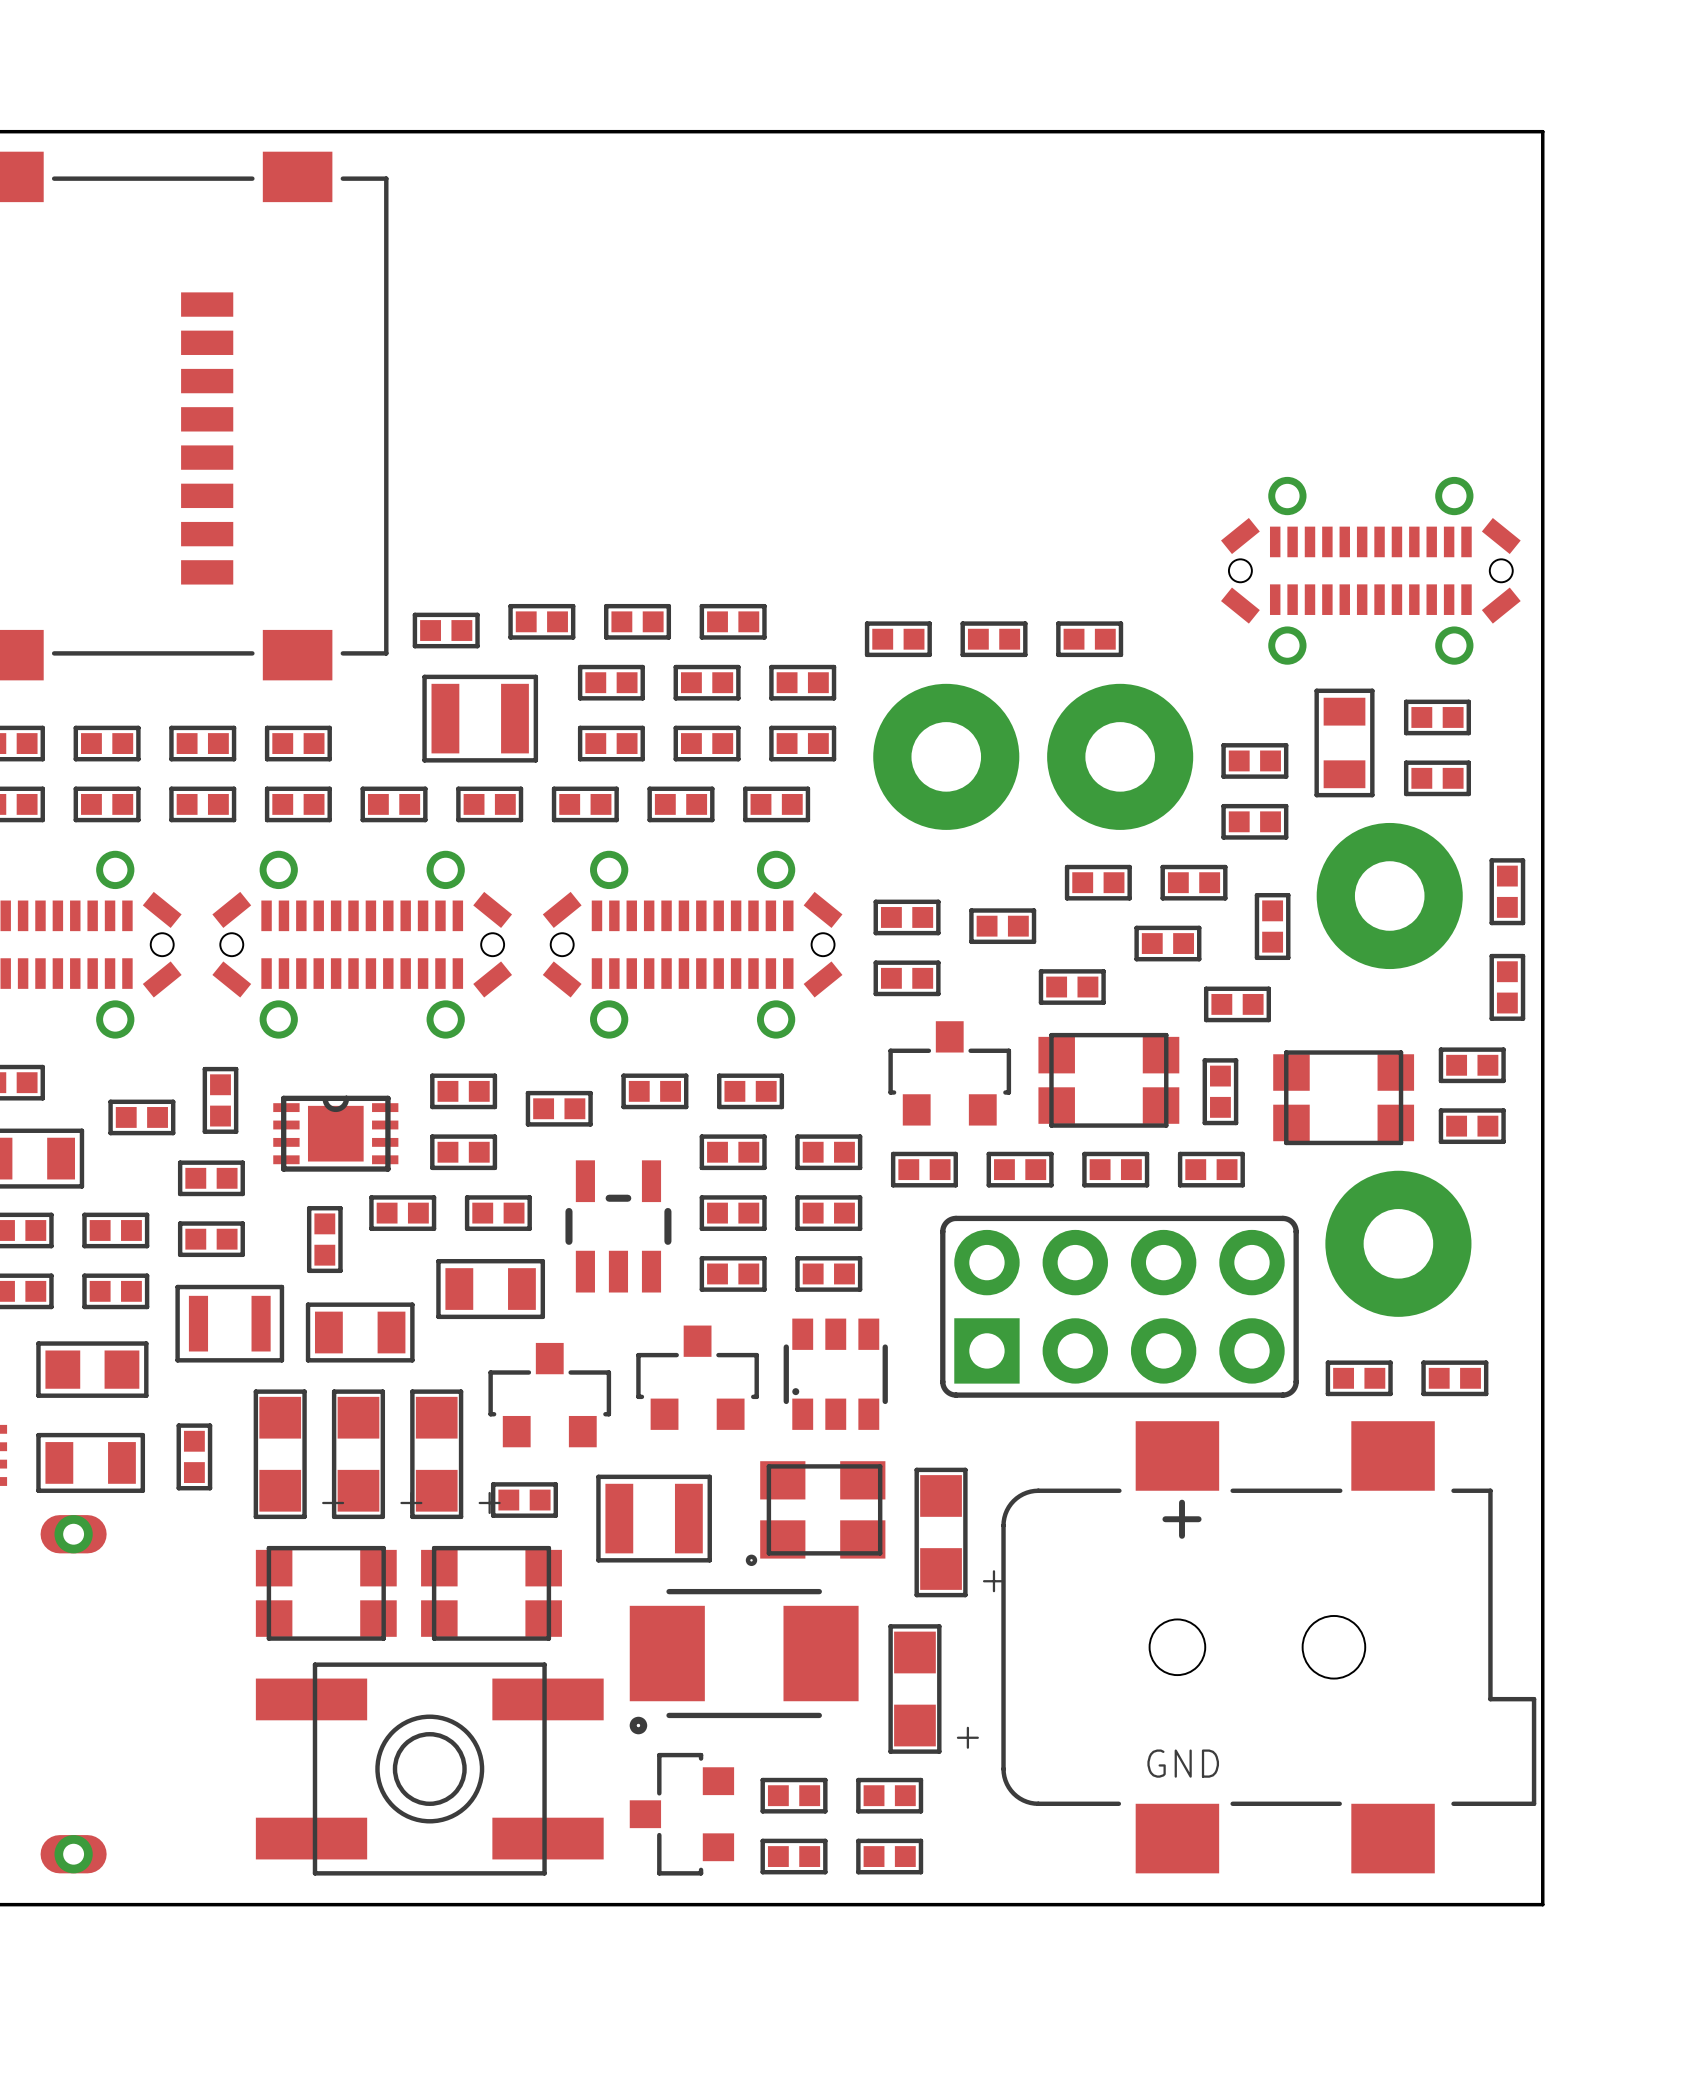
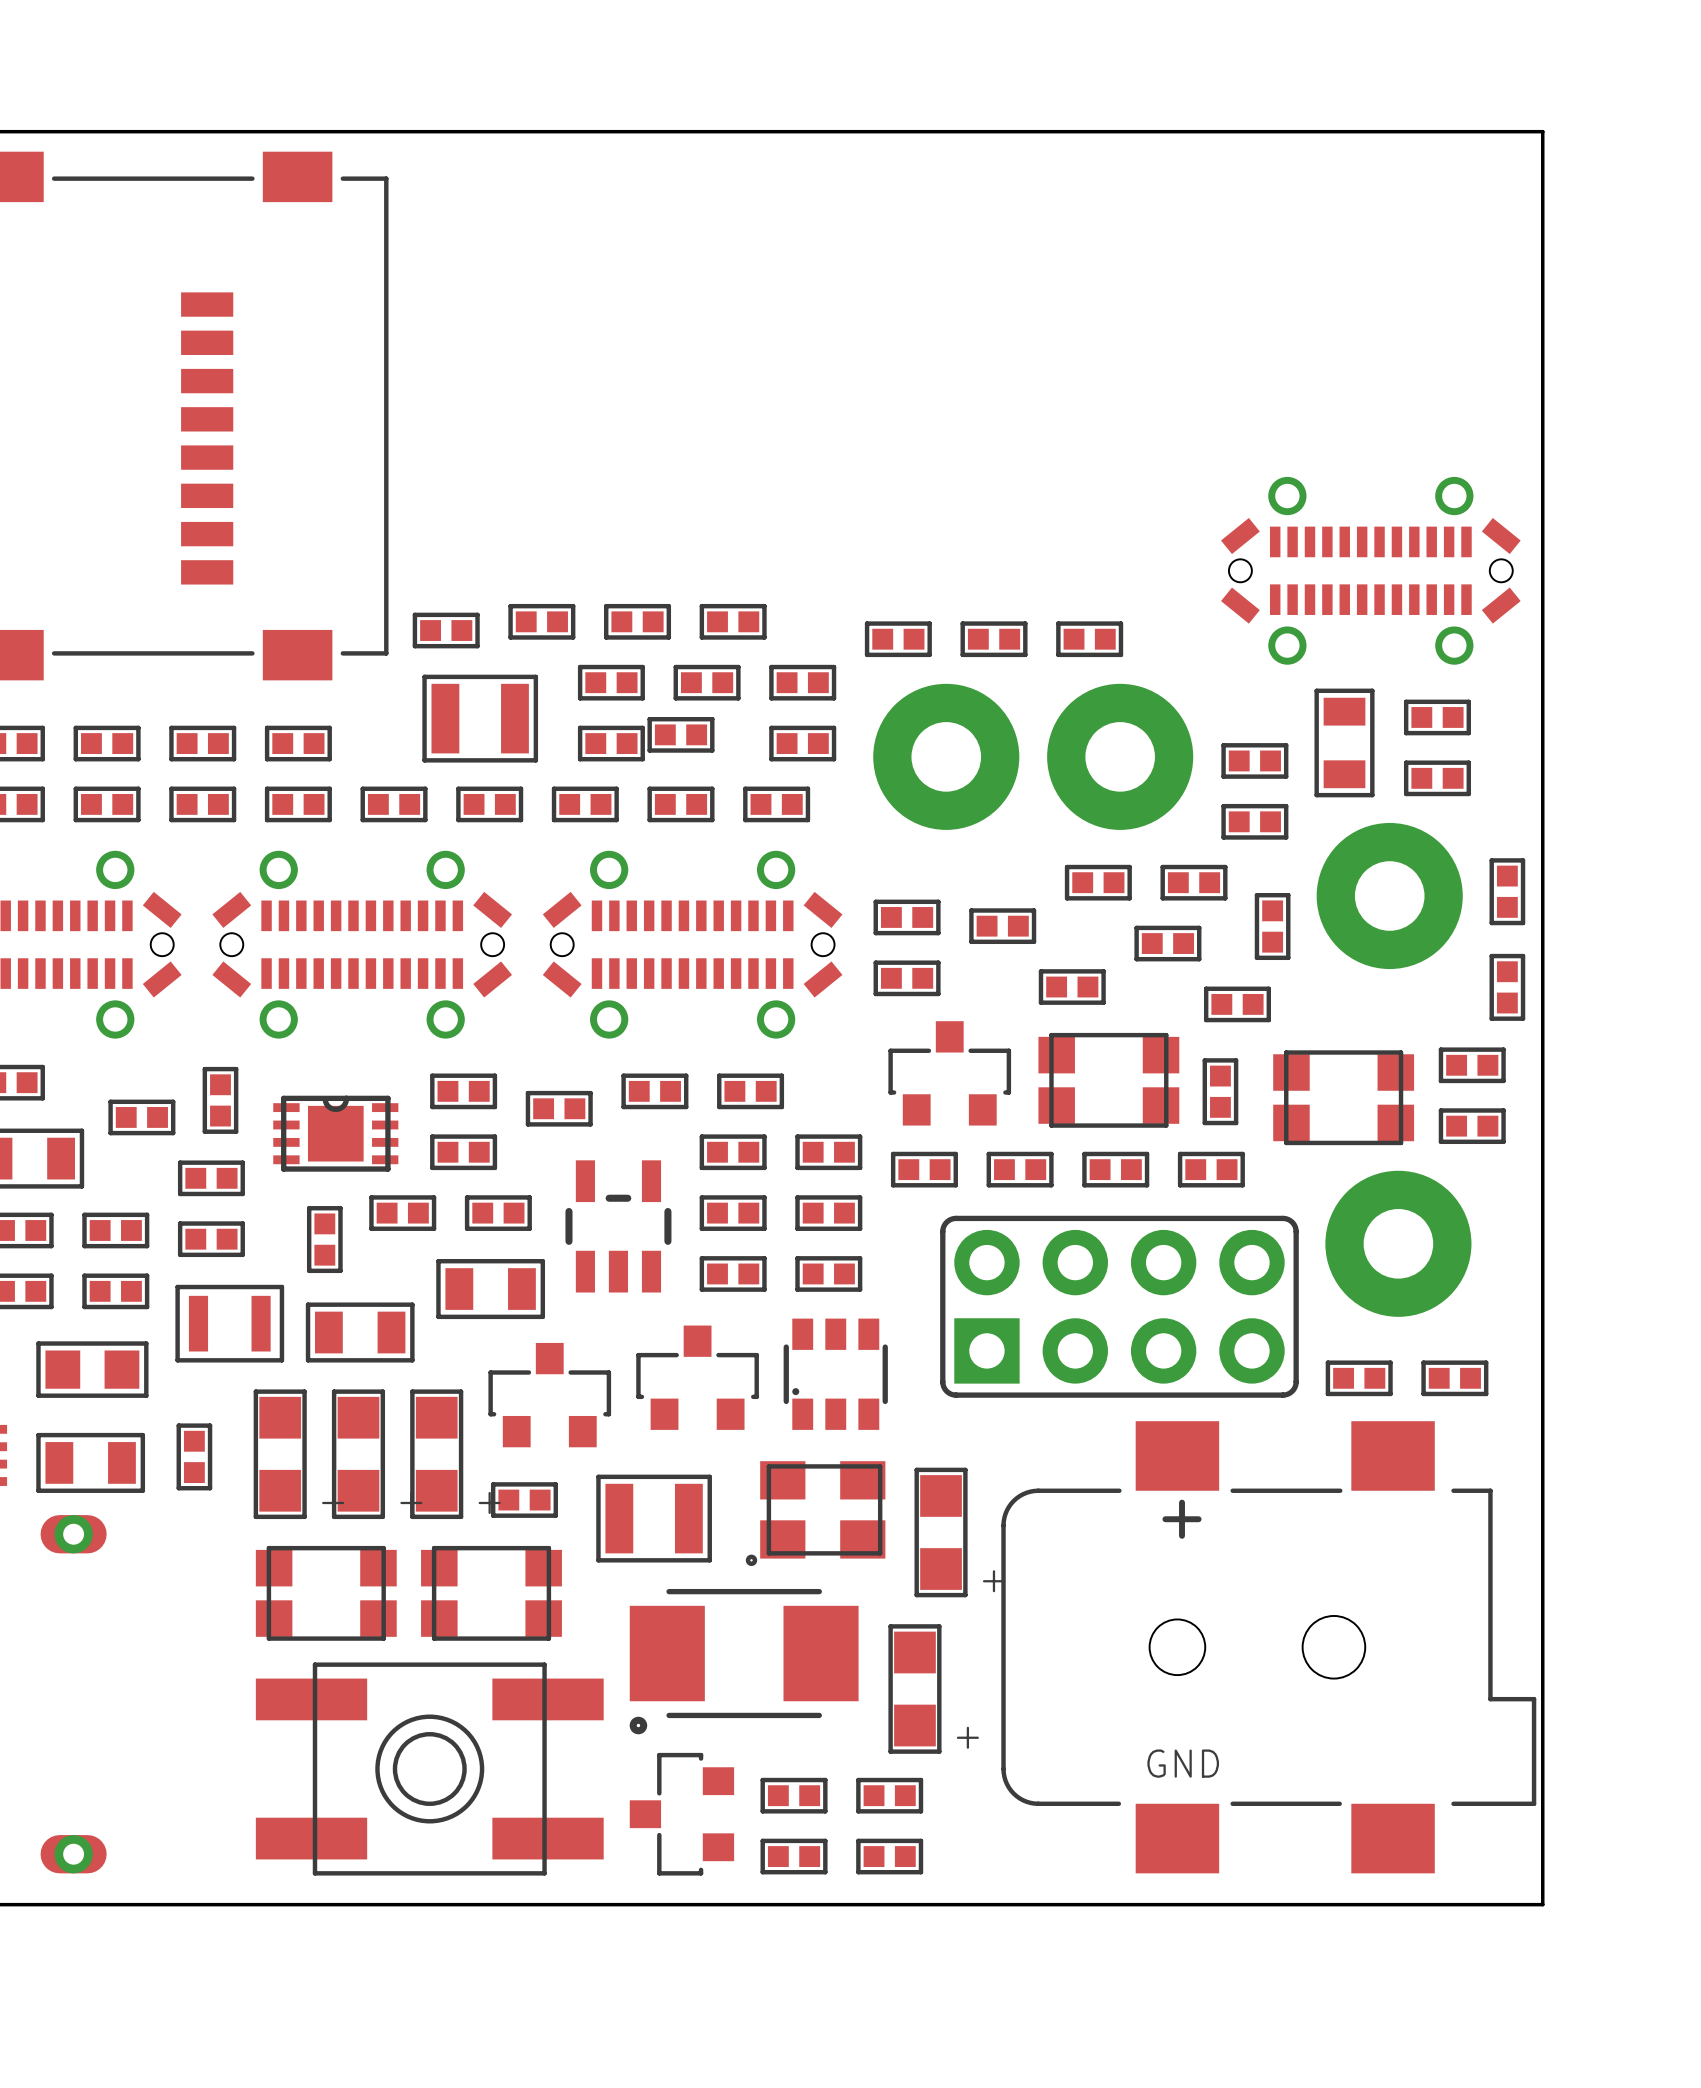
part position: (707, 743) -> (680, 734)

